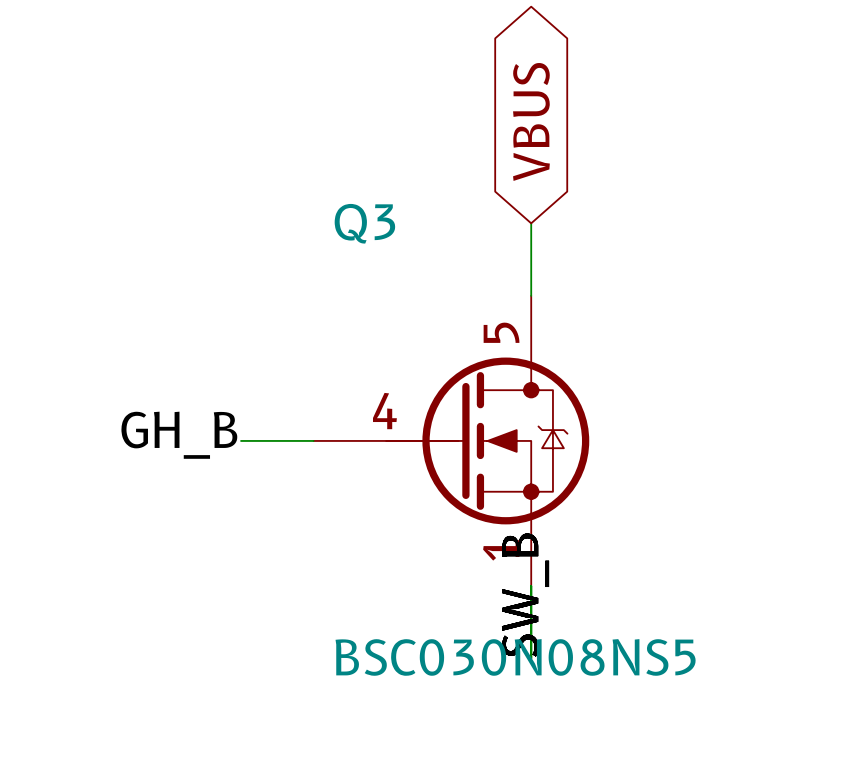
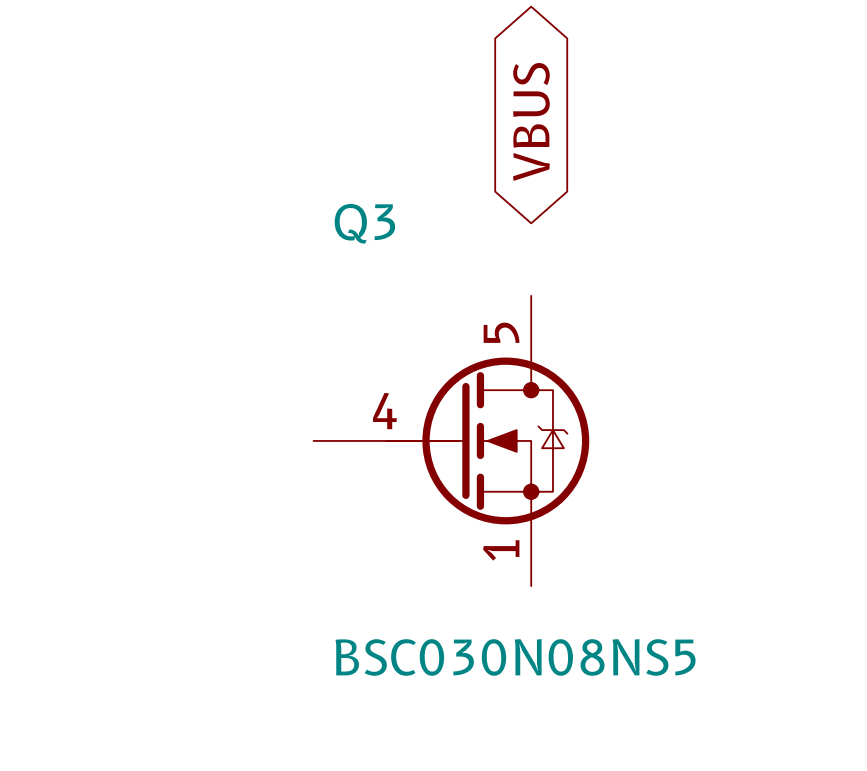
wire: (531, 223) (531, 295) -> none
label: GH_B (179, 435) -> none
wire: (241, 440) (313, 440) -> none
wire: (531, 586) (531, 658) -> none
label: SW_B (525, 595) -> none

